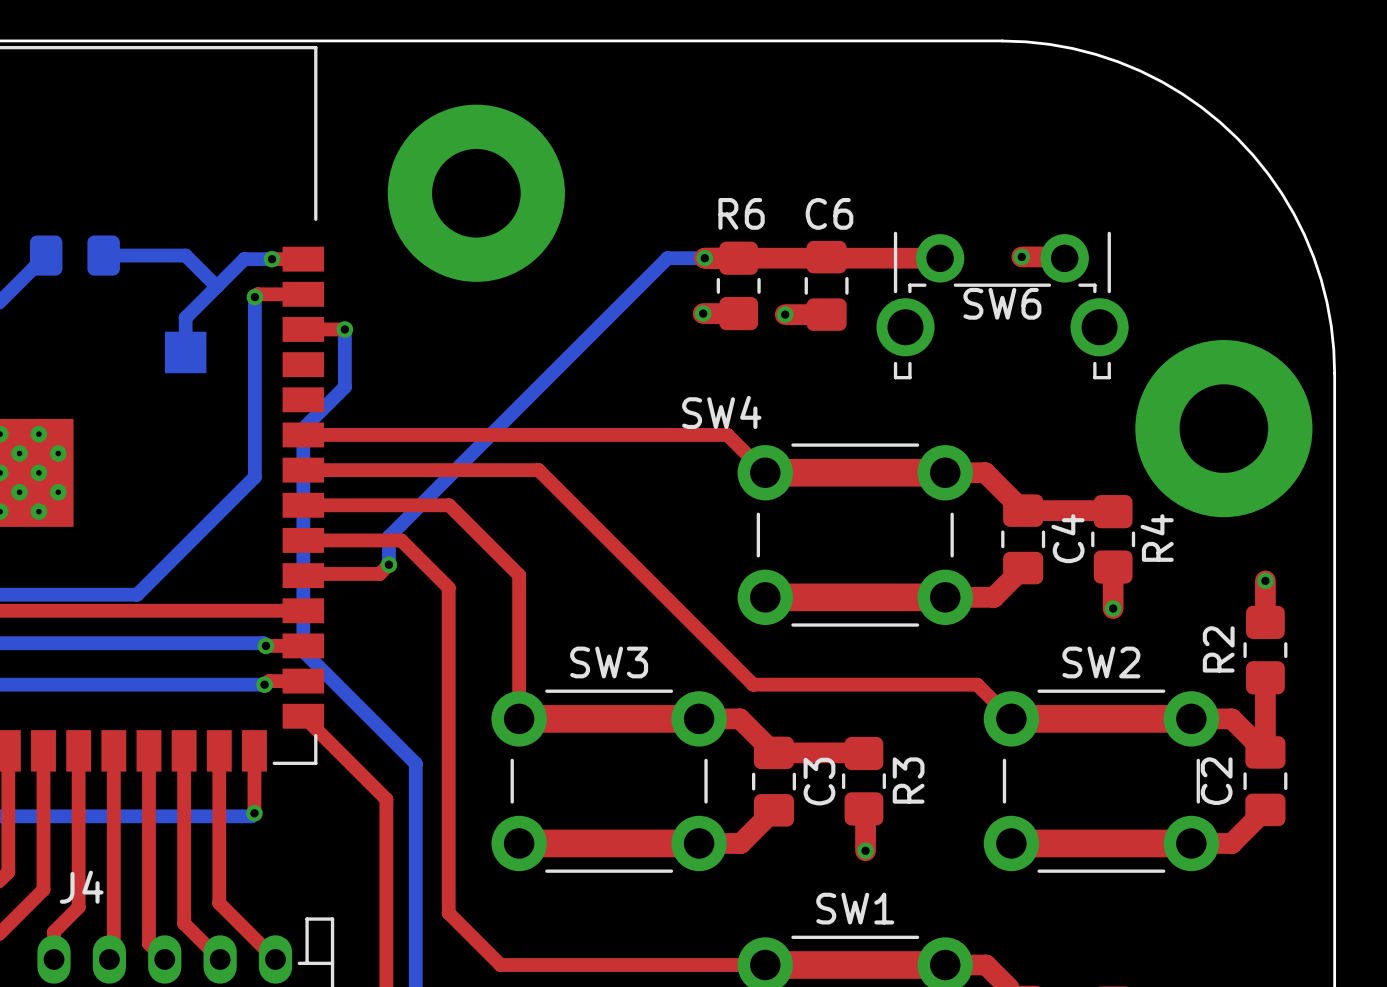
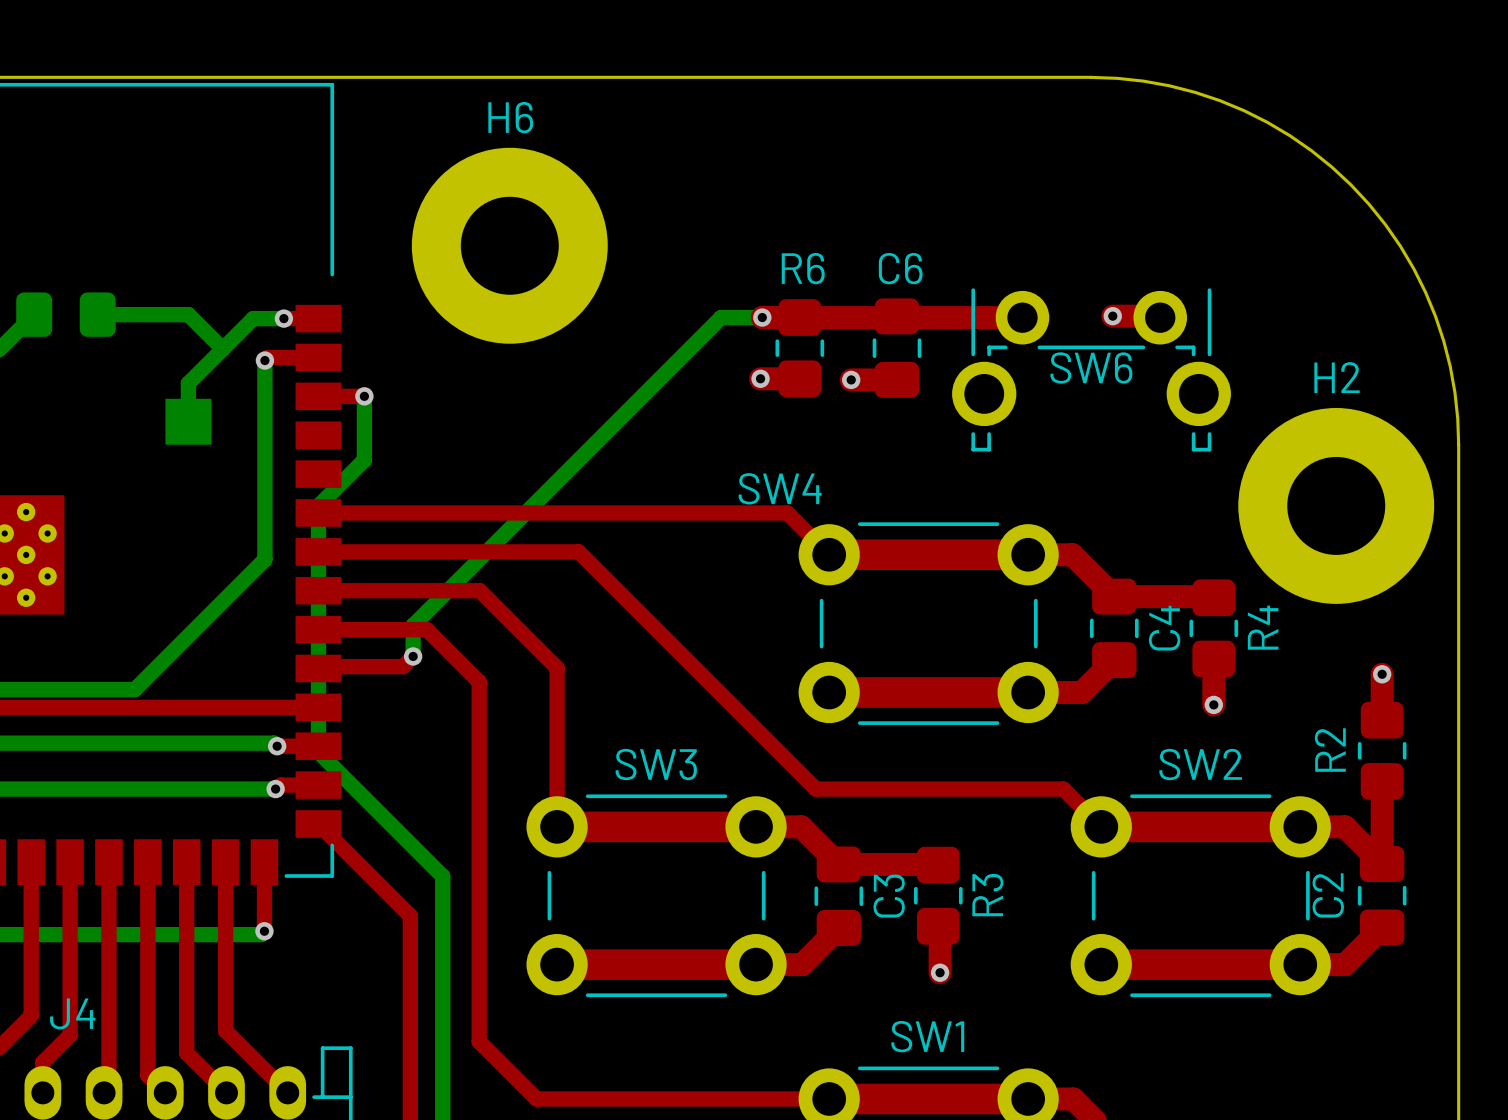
H6 name: none -> H6 (510, 117)
H2 name: none -> H2 (1337, 377)

